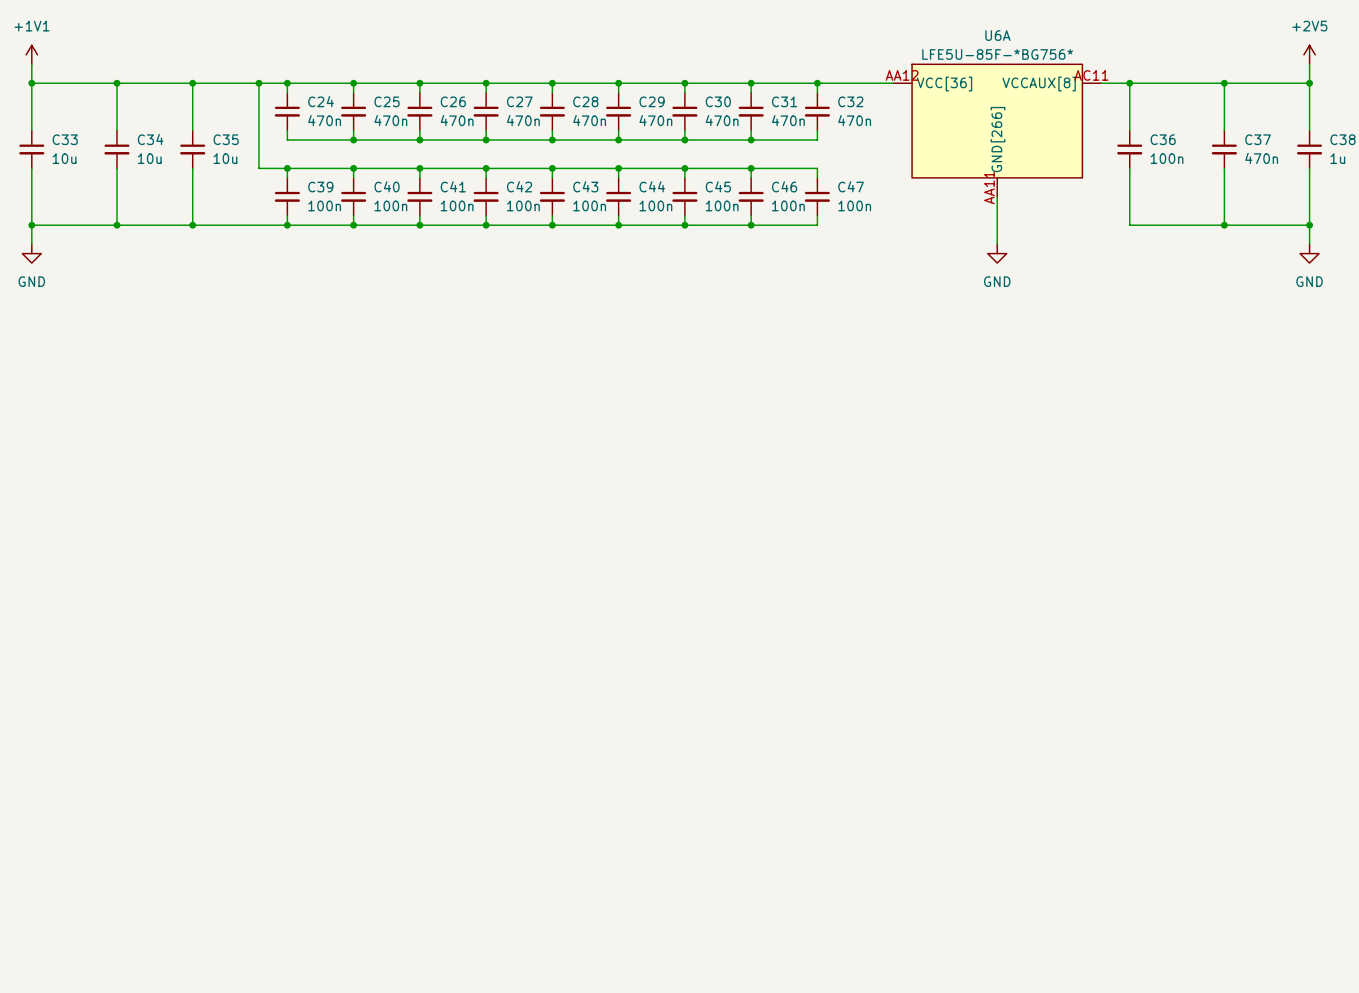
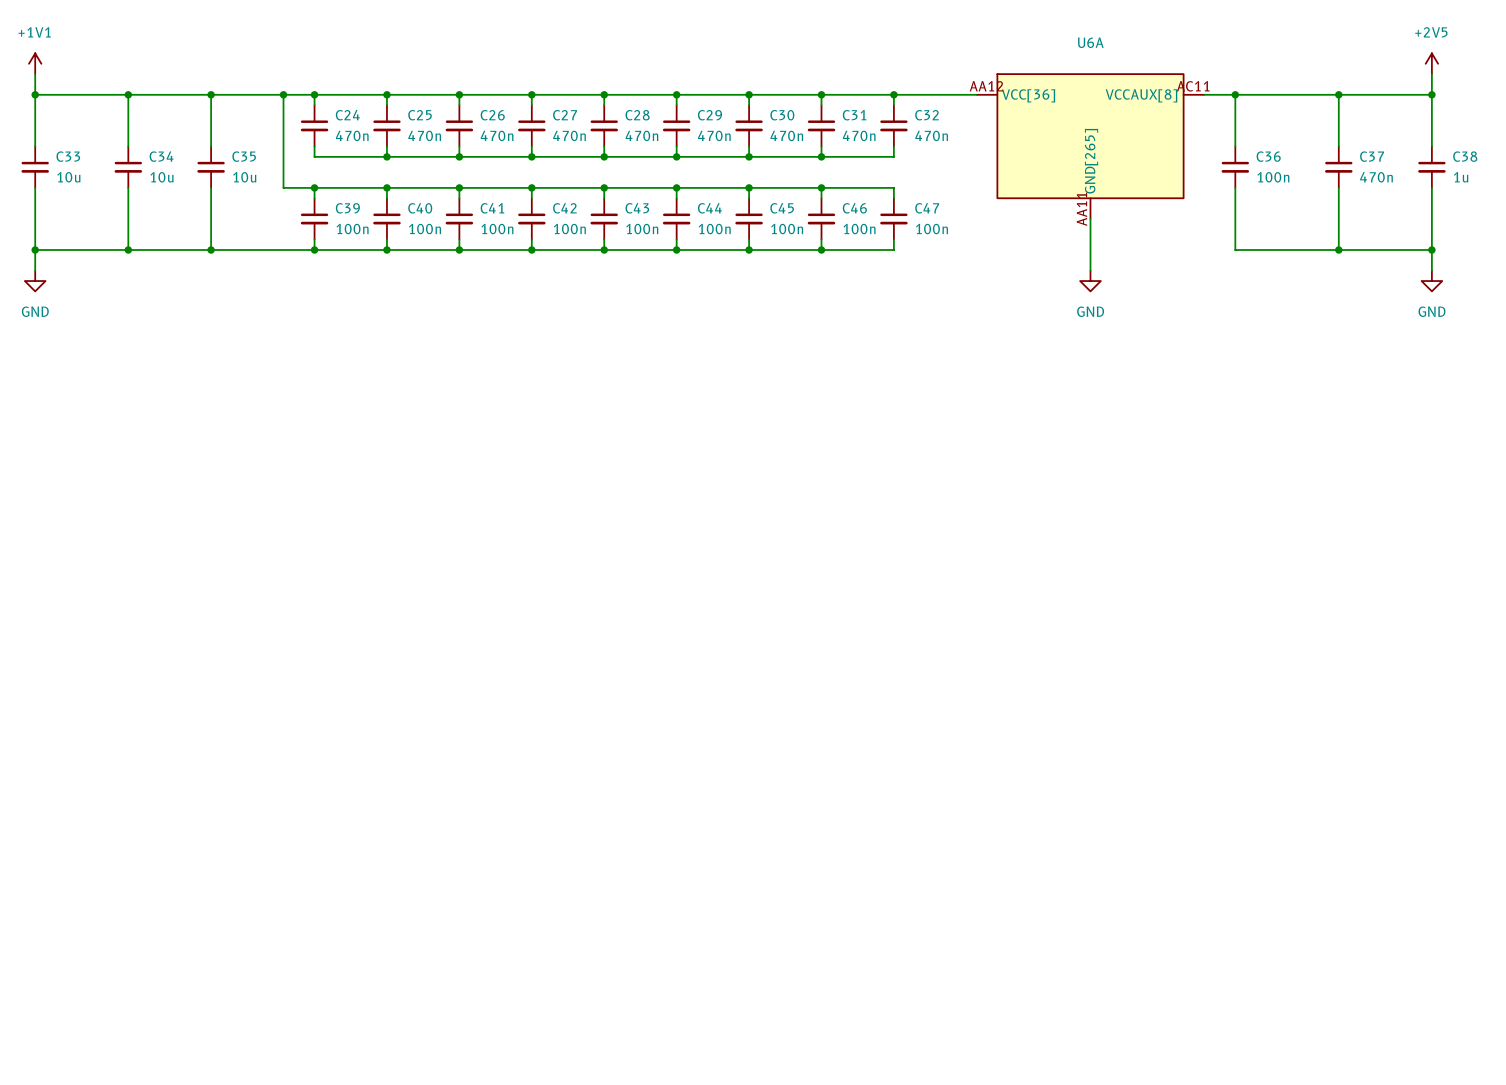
U6A value: LFE5U-85F-*BG756* (997, 54) -> none
U6A pin name: GND[266] (998, 139) -> GND[265] (1091, 161)

